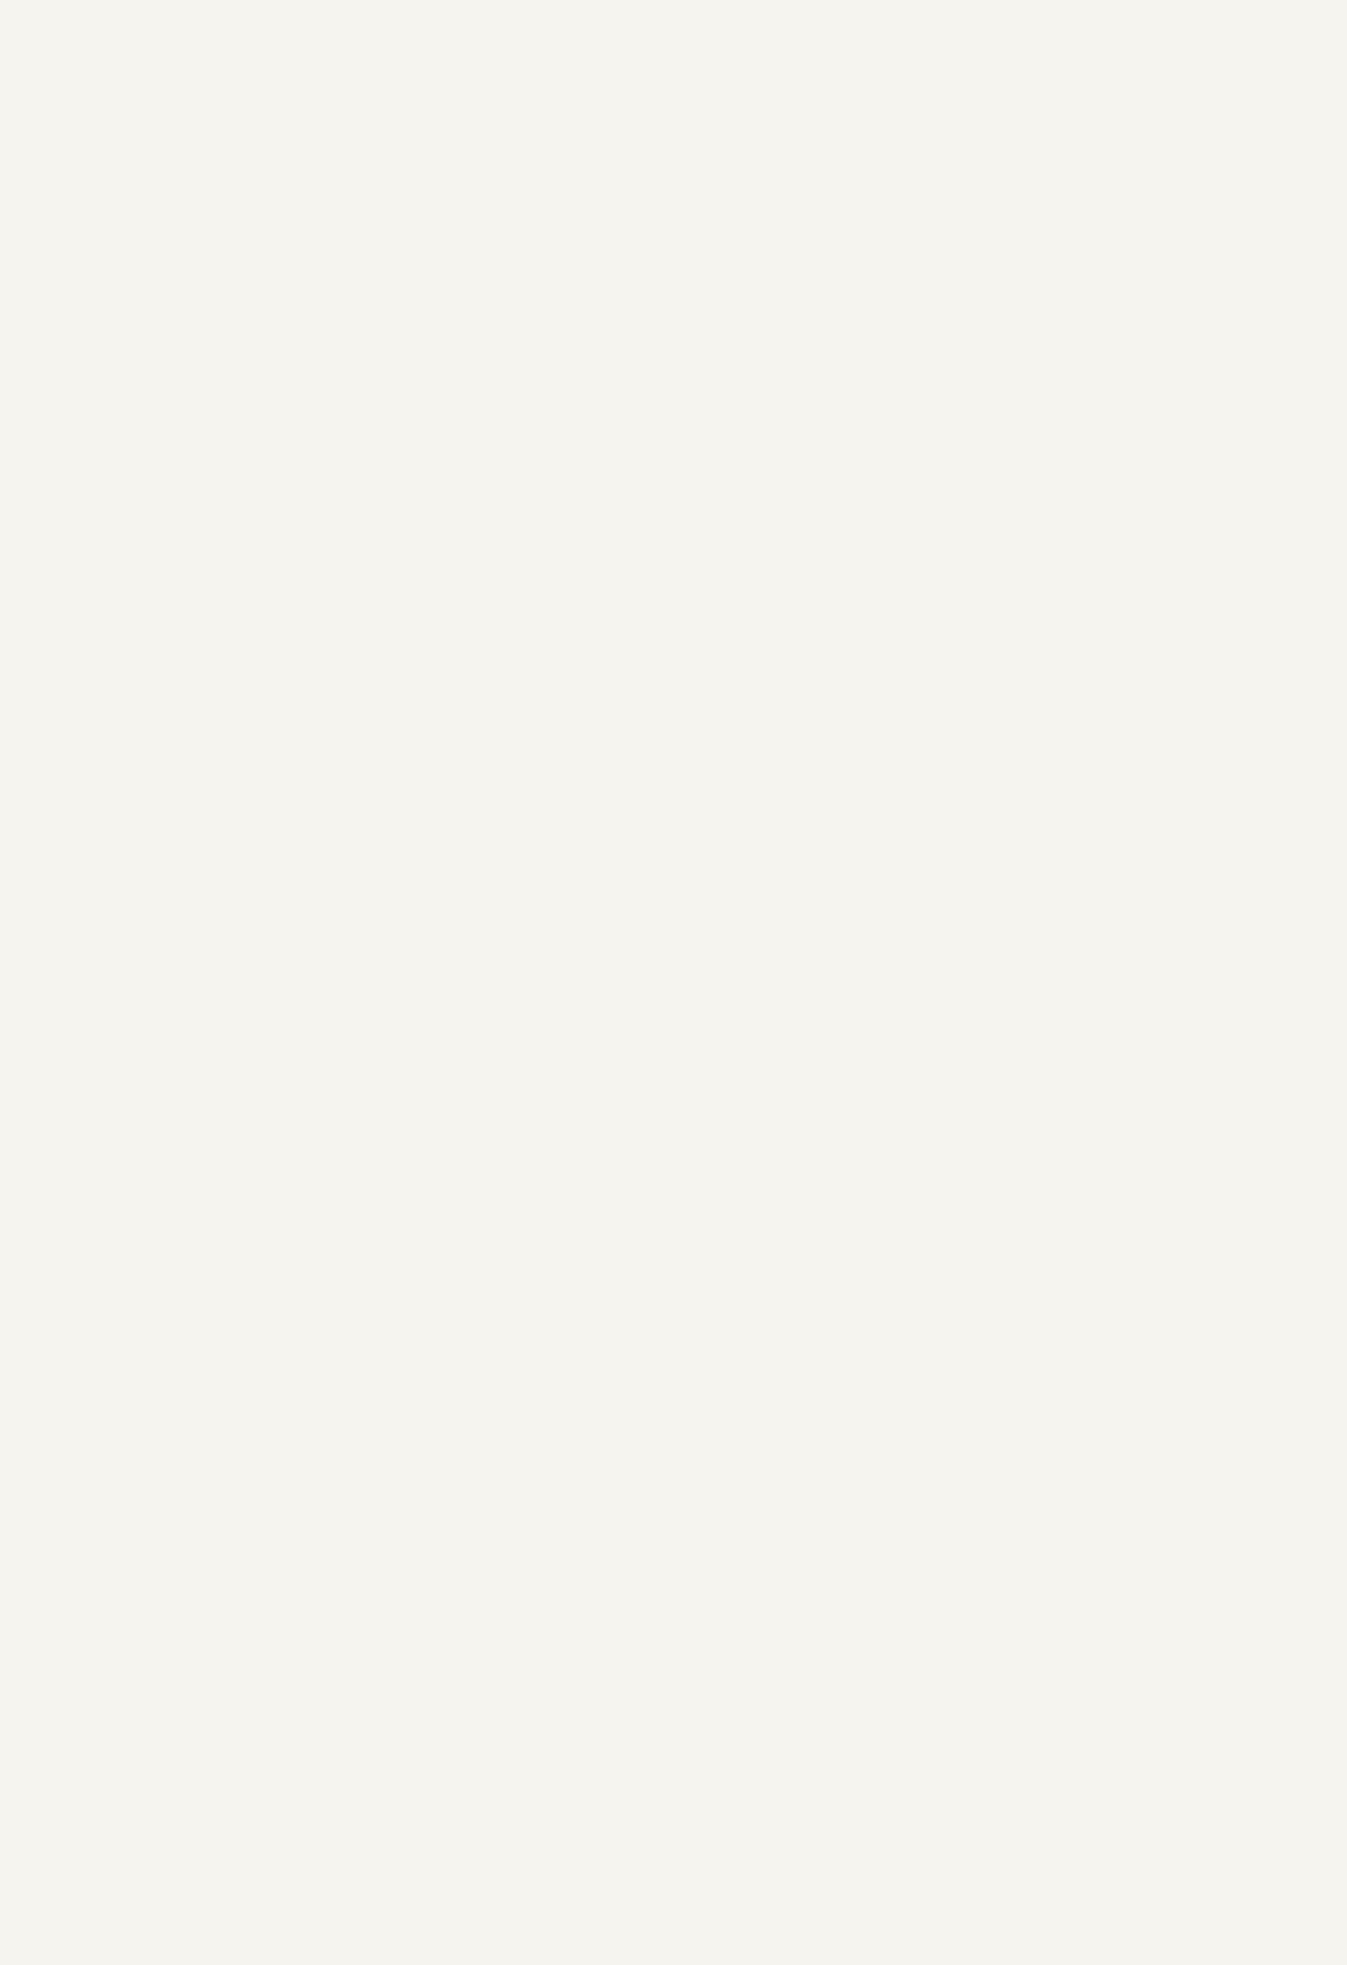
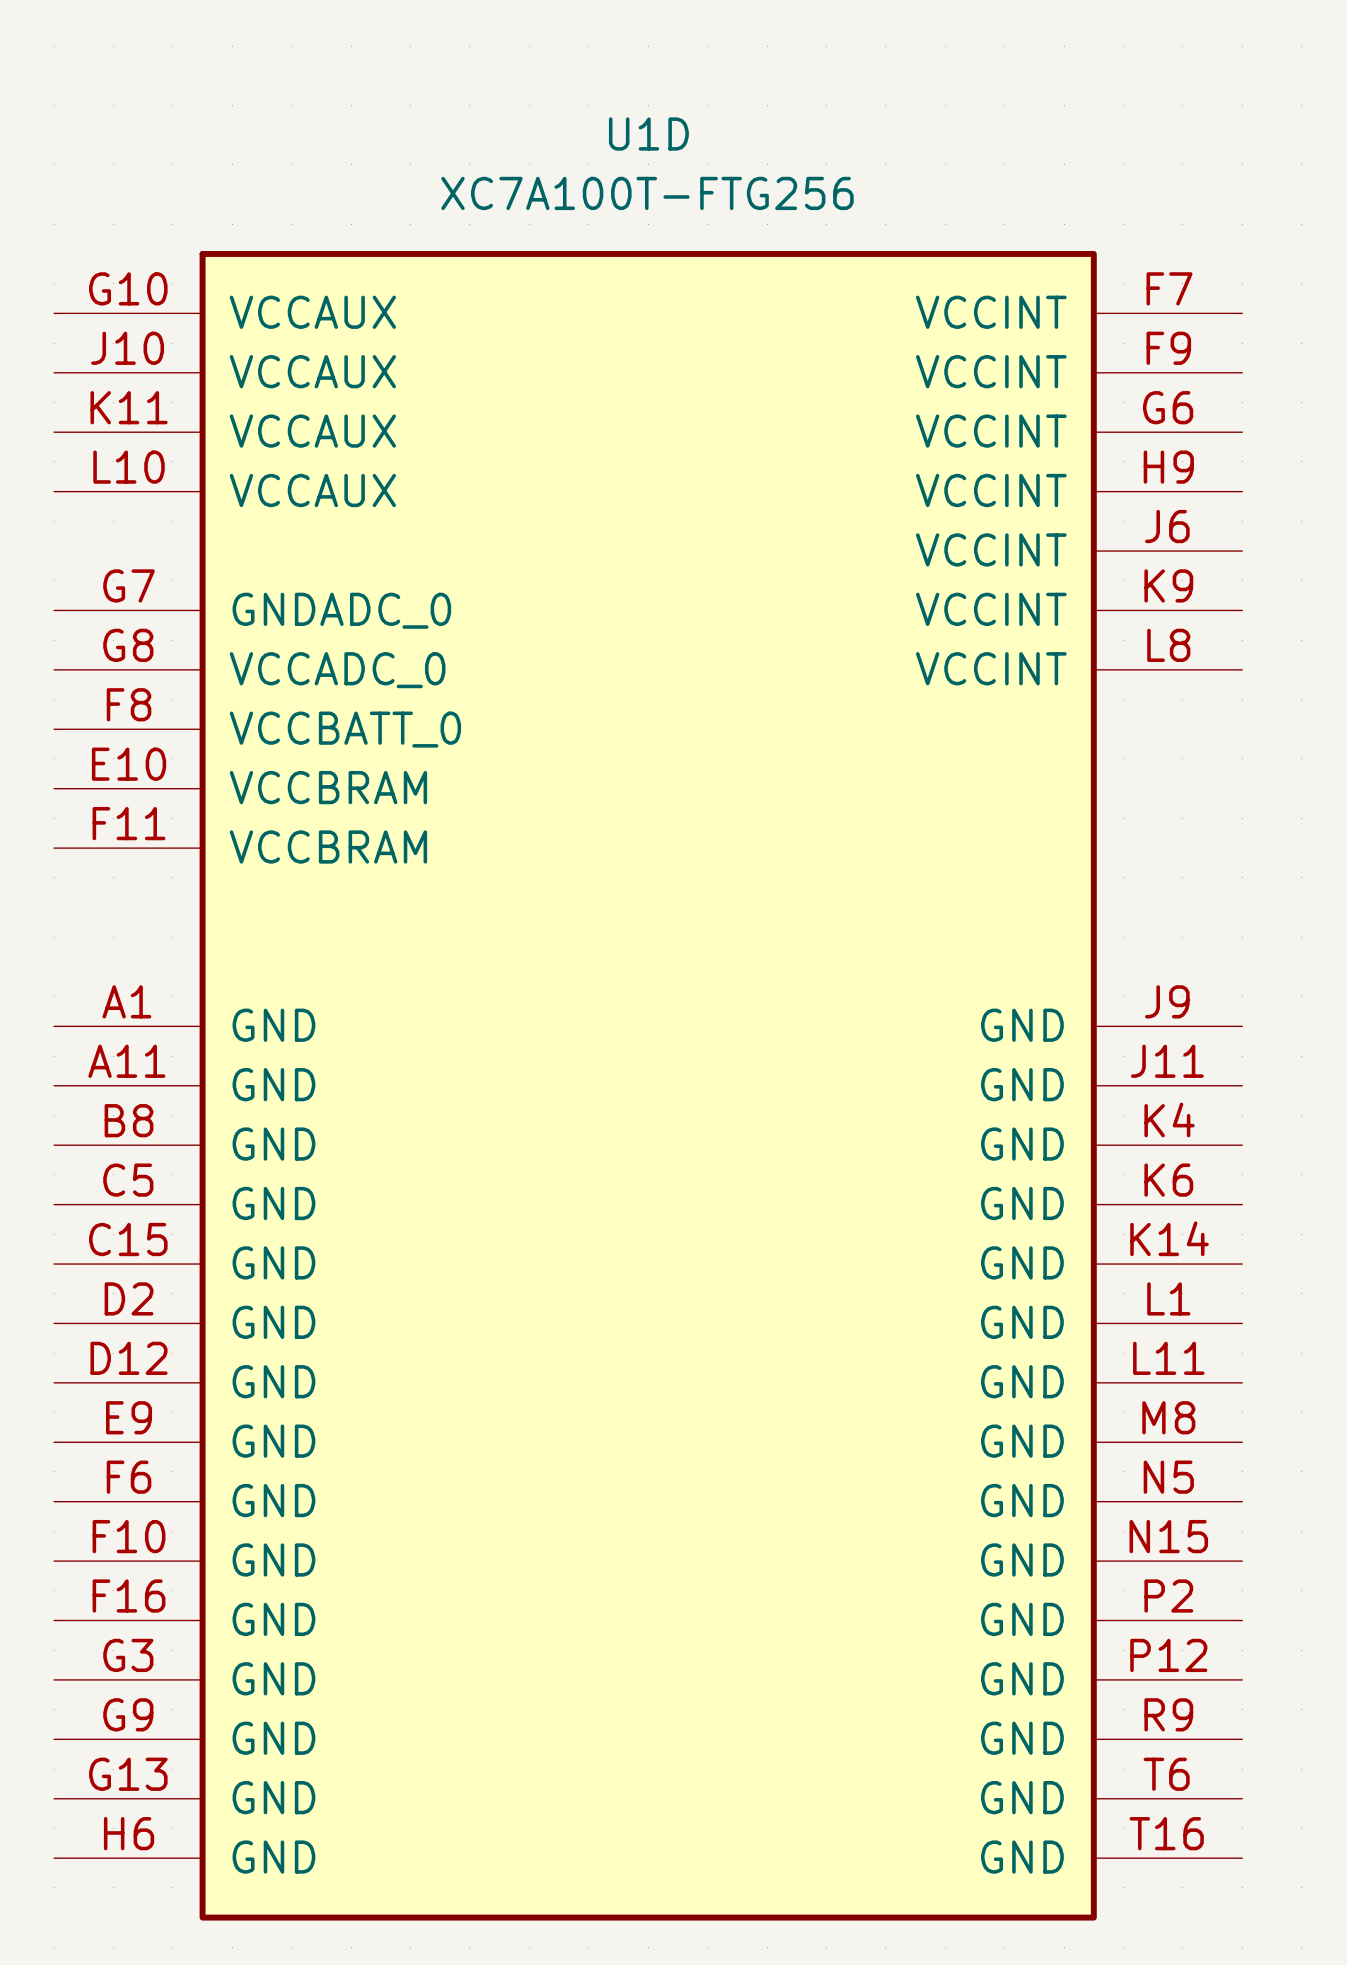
U1D: none -> XC7A100T-FTG256 (648, 1085)

